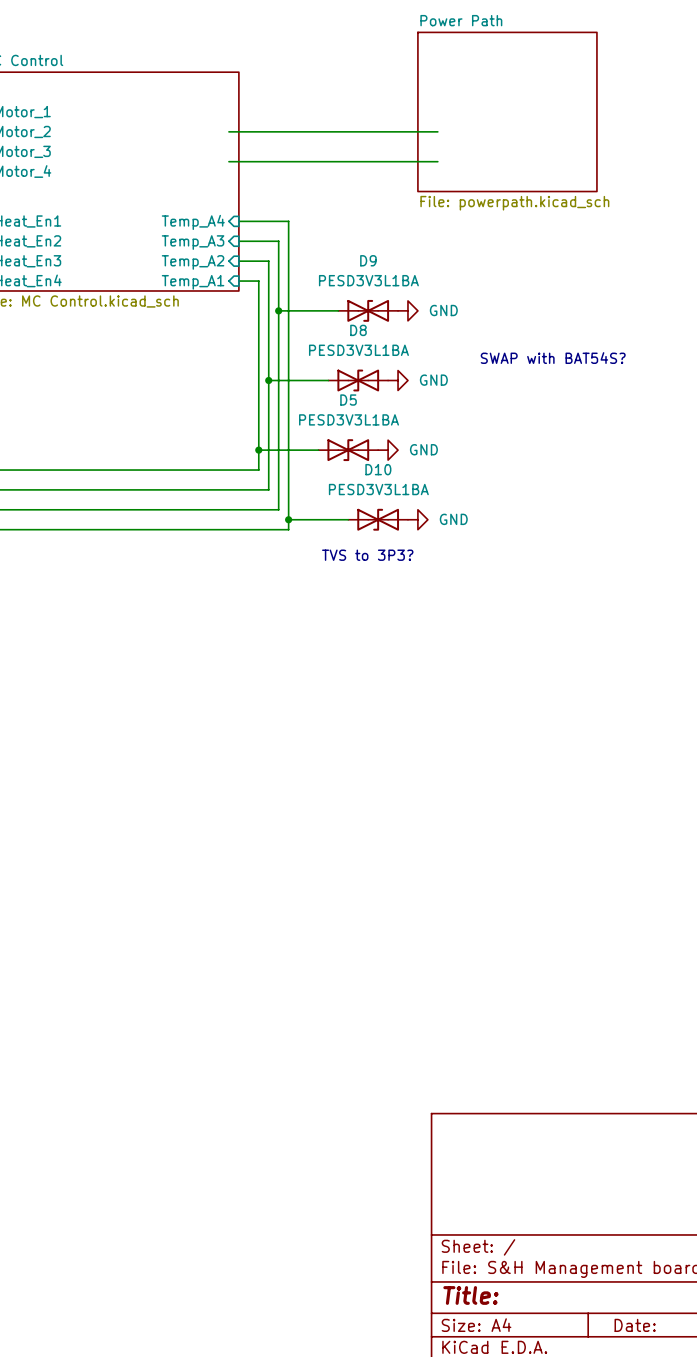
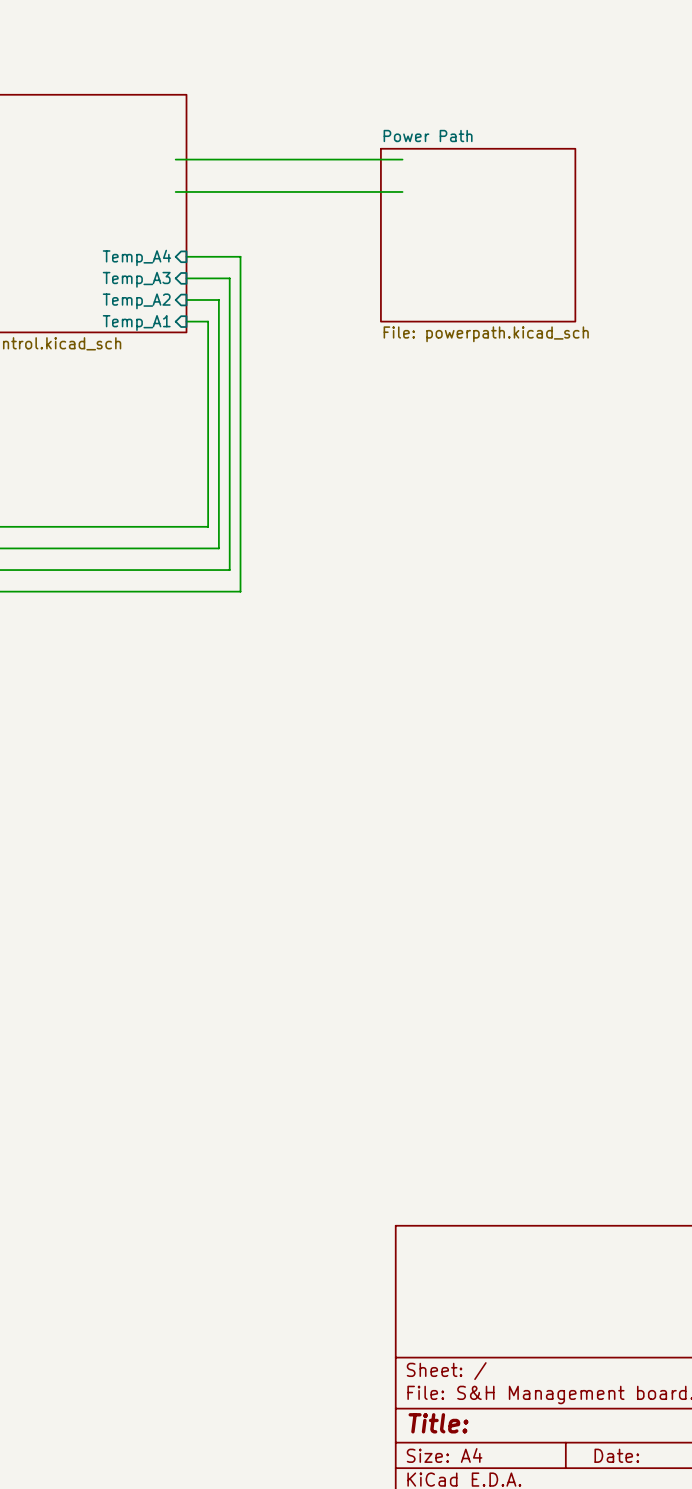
sheet Power Path position: (507, 111) -> (478, 235)
wire: (278, 310) (338, 310) -> none
junction: (278, 310) -> none
D9: PESD3V3L1BA (368, 310) -> none
power symbol: GND (407, 310) -> none
text: SWAP with BAT54S? (553, 358) -> none
wire: (268, 380) (328, 380) -> none
junction: (268, 380) -> none
D8: PESD3V3L1BA (358, 380) -> none
power symbol: GND (398, 380) -> none
wire: (258, 450) (318, 450) -> none
junction: (258, 450) -> none
D5: PESD3V3L1BA (348, 450) -> none
power symbol: GND (388, 450) -> none
wire: (288, 519) (348, 519) -> none
junction: (288, 519) -> none
D10: PESD3V3L1BA (378, 519) -> none
power symbol: GND (417, 519) -> none
text: TVS to 3P3? (367, 555) -> none

